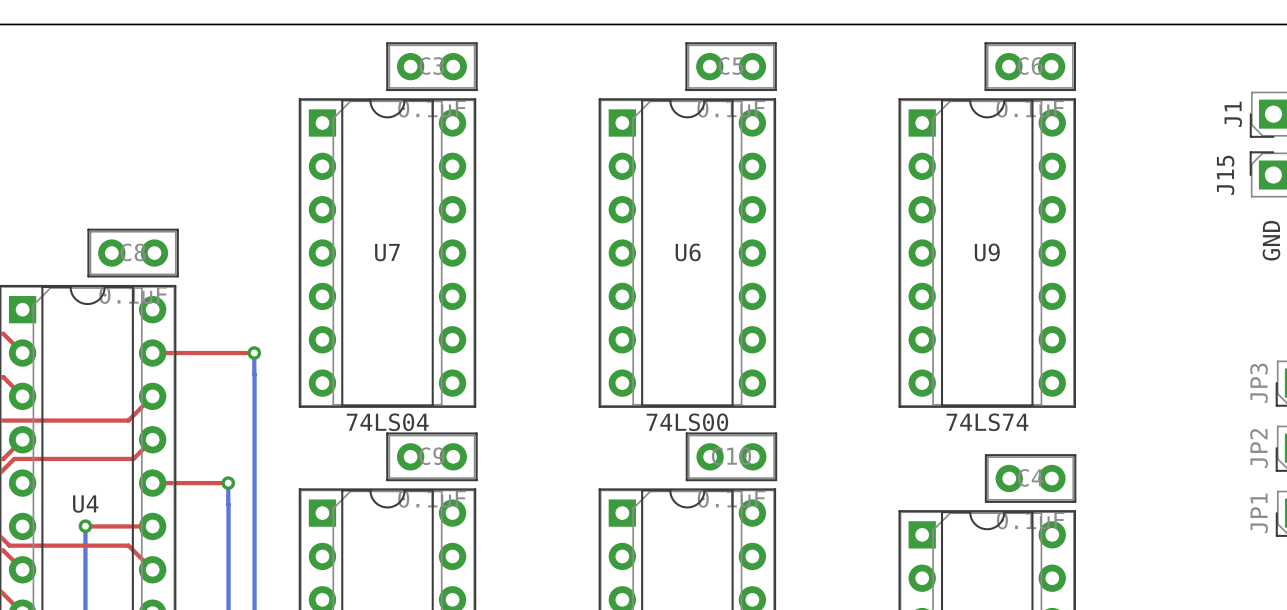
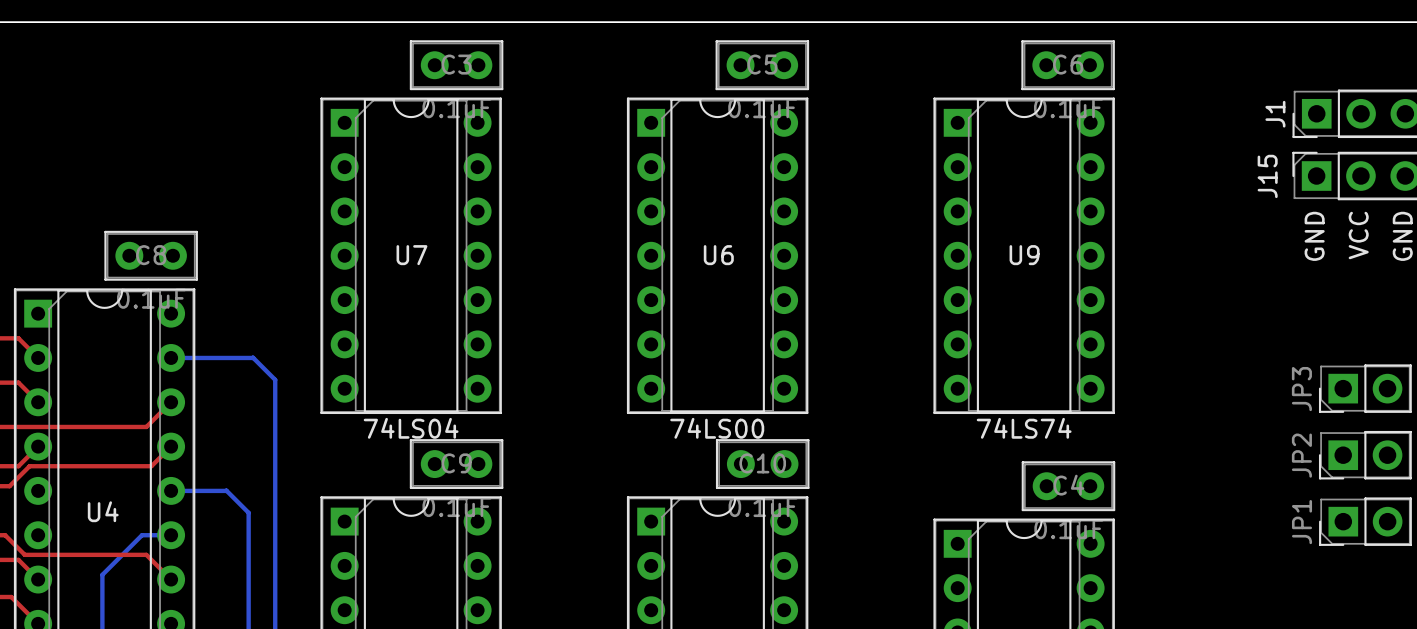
top track: (254, 352) (152, 353) -> none
bottom track: (254, 353) (254, 374) -> (171, 357) (253, 357) (274, 379)
via: (254, 353) -> none
top track: (228, 482) (152, 483) -> none
bottom track: (228, 483) (228, 504) -> (171, 490) (226, 490) (248, 512)
via: (228, 483) -> none
top track: (85, 526) (152, 526) -> none
bottom track: (85, 526) (85, 565) -> (171, 535) (142, 535) (102, 574)
via: (85, 526) -> none

